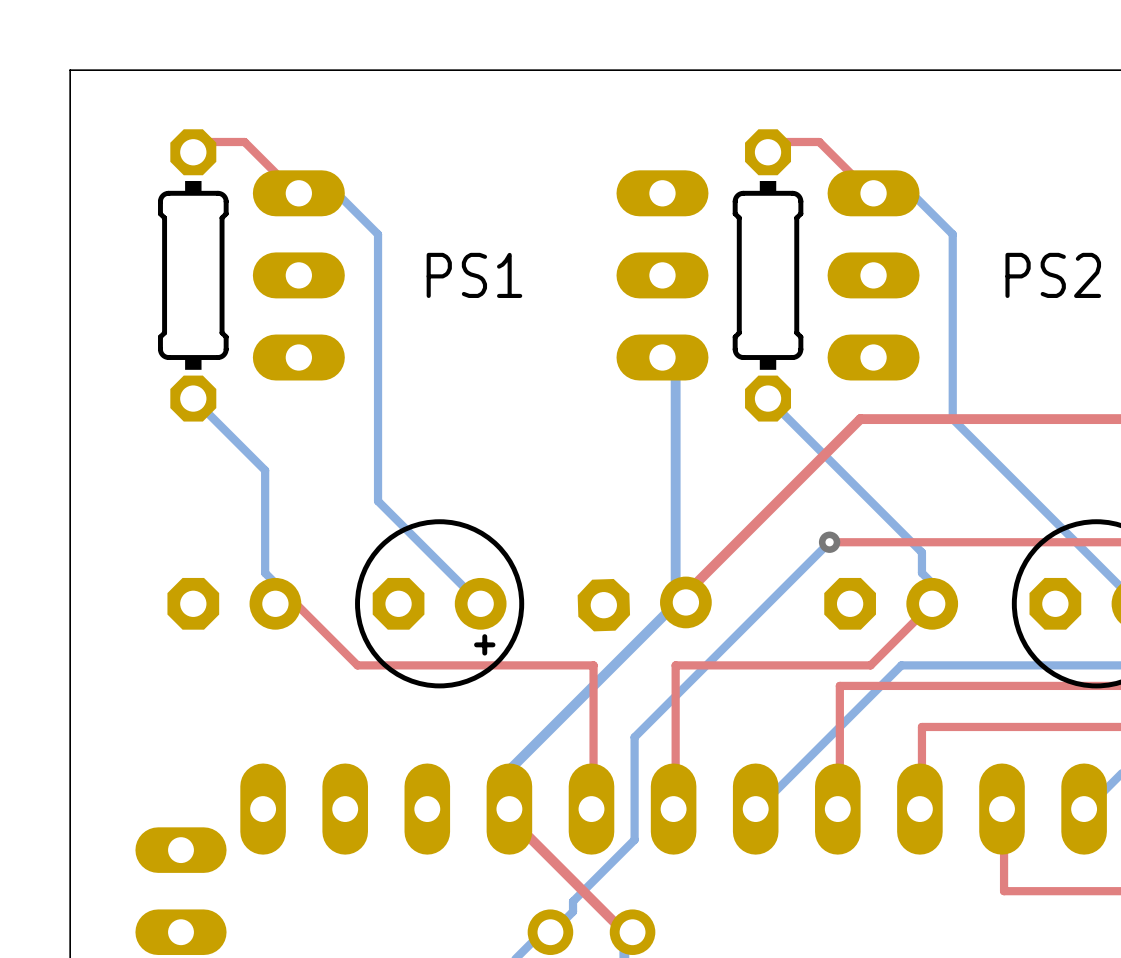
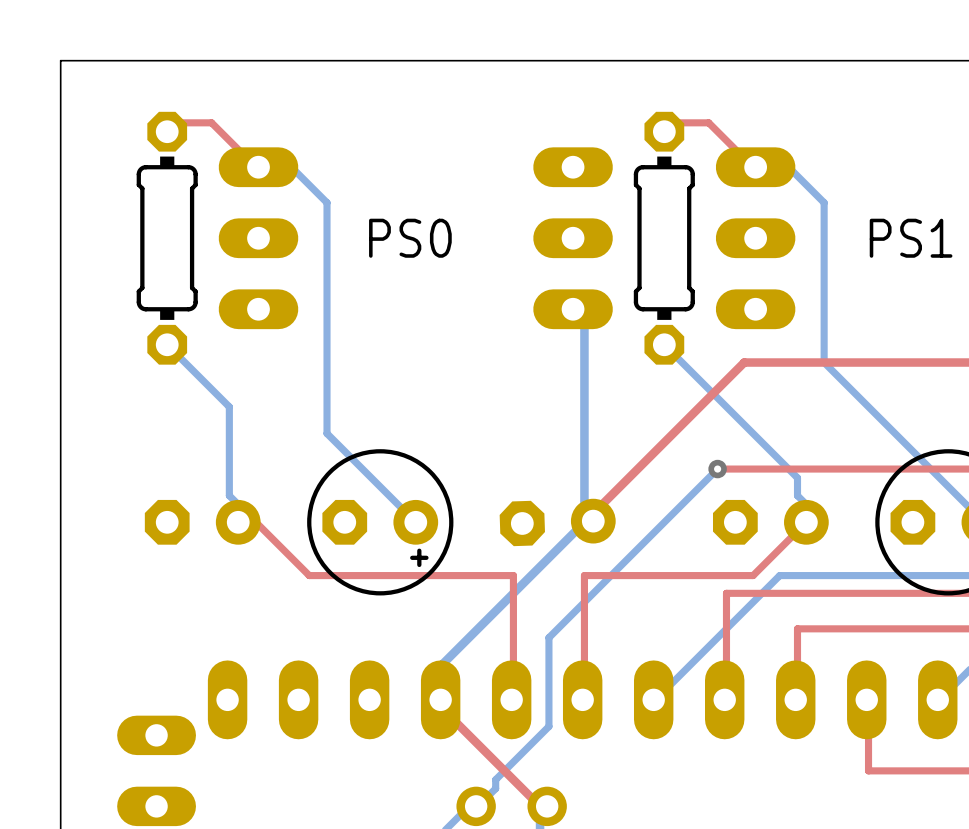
PS1 name: PS1 (474, 275) -> PS0 (410, 238)
PS2 name: PS2 (1053, 275) -> PS1 (911, 238)

